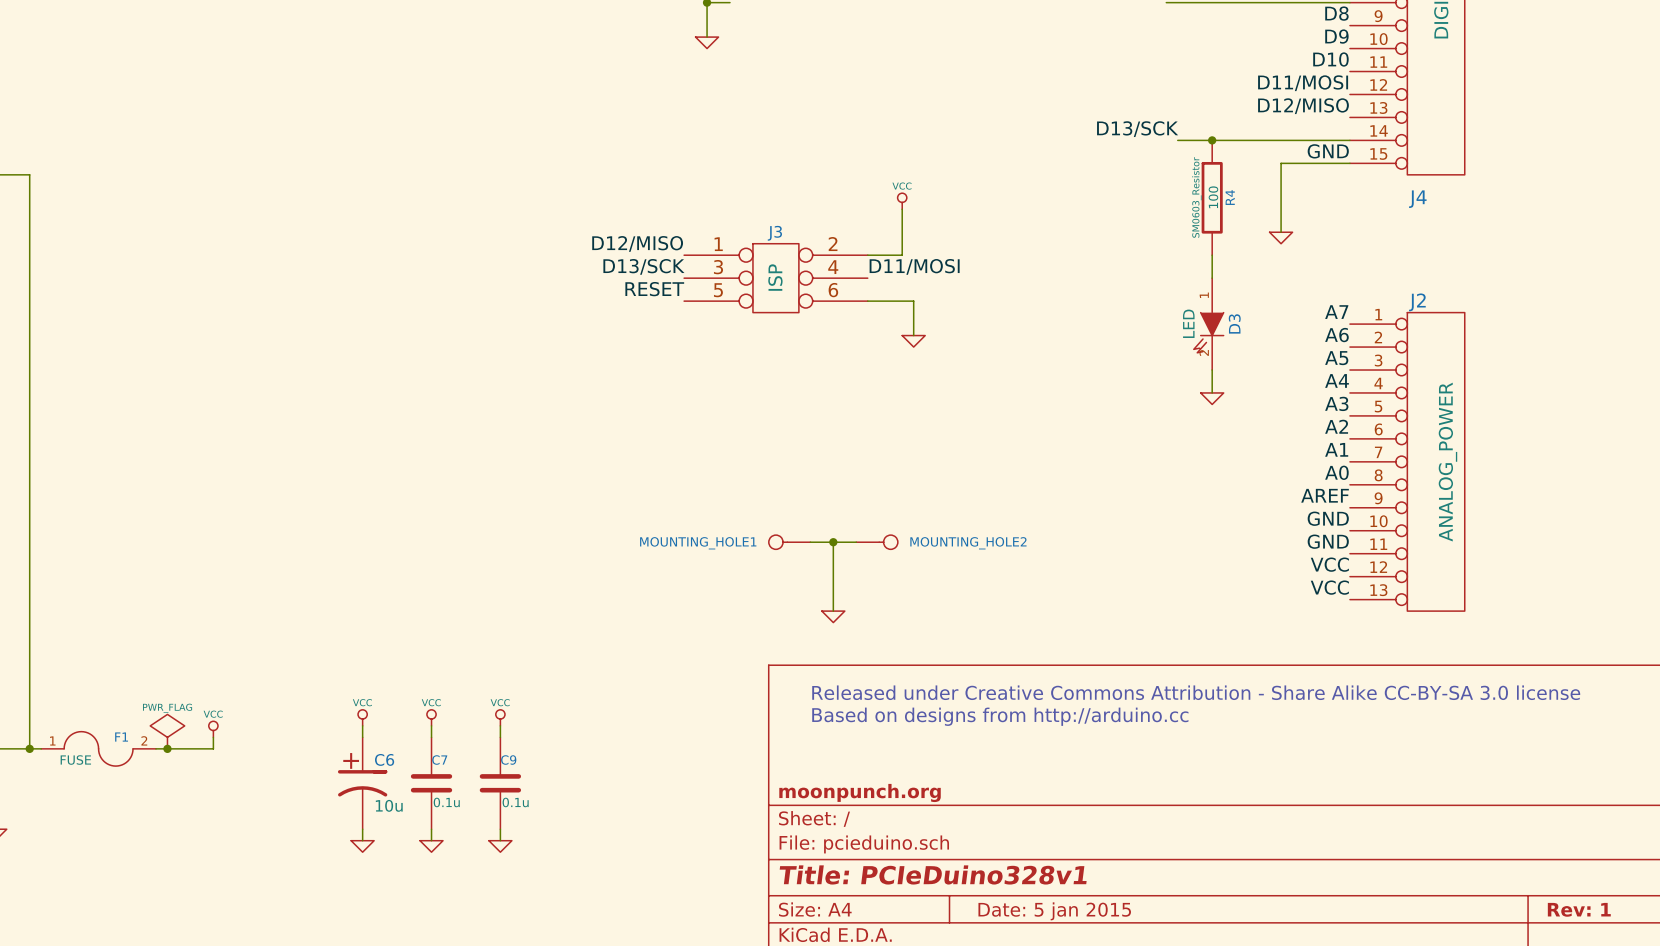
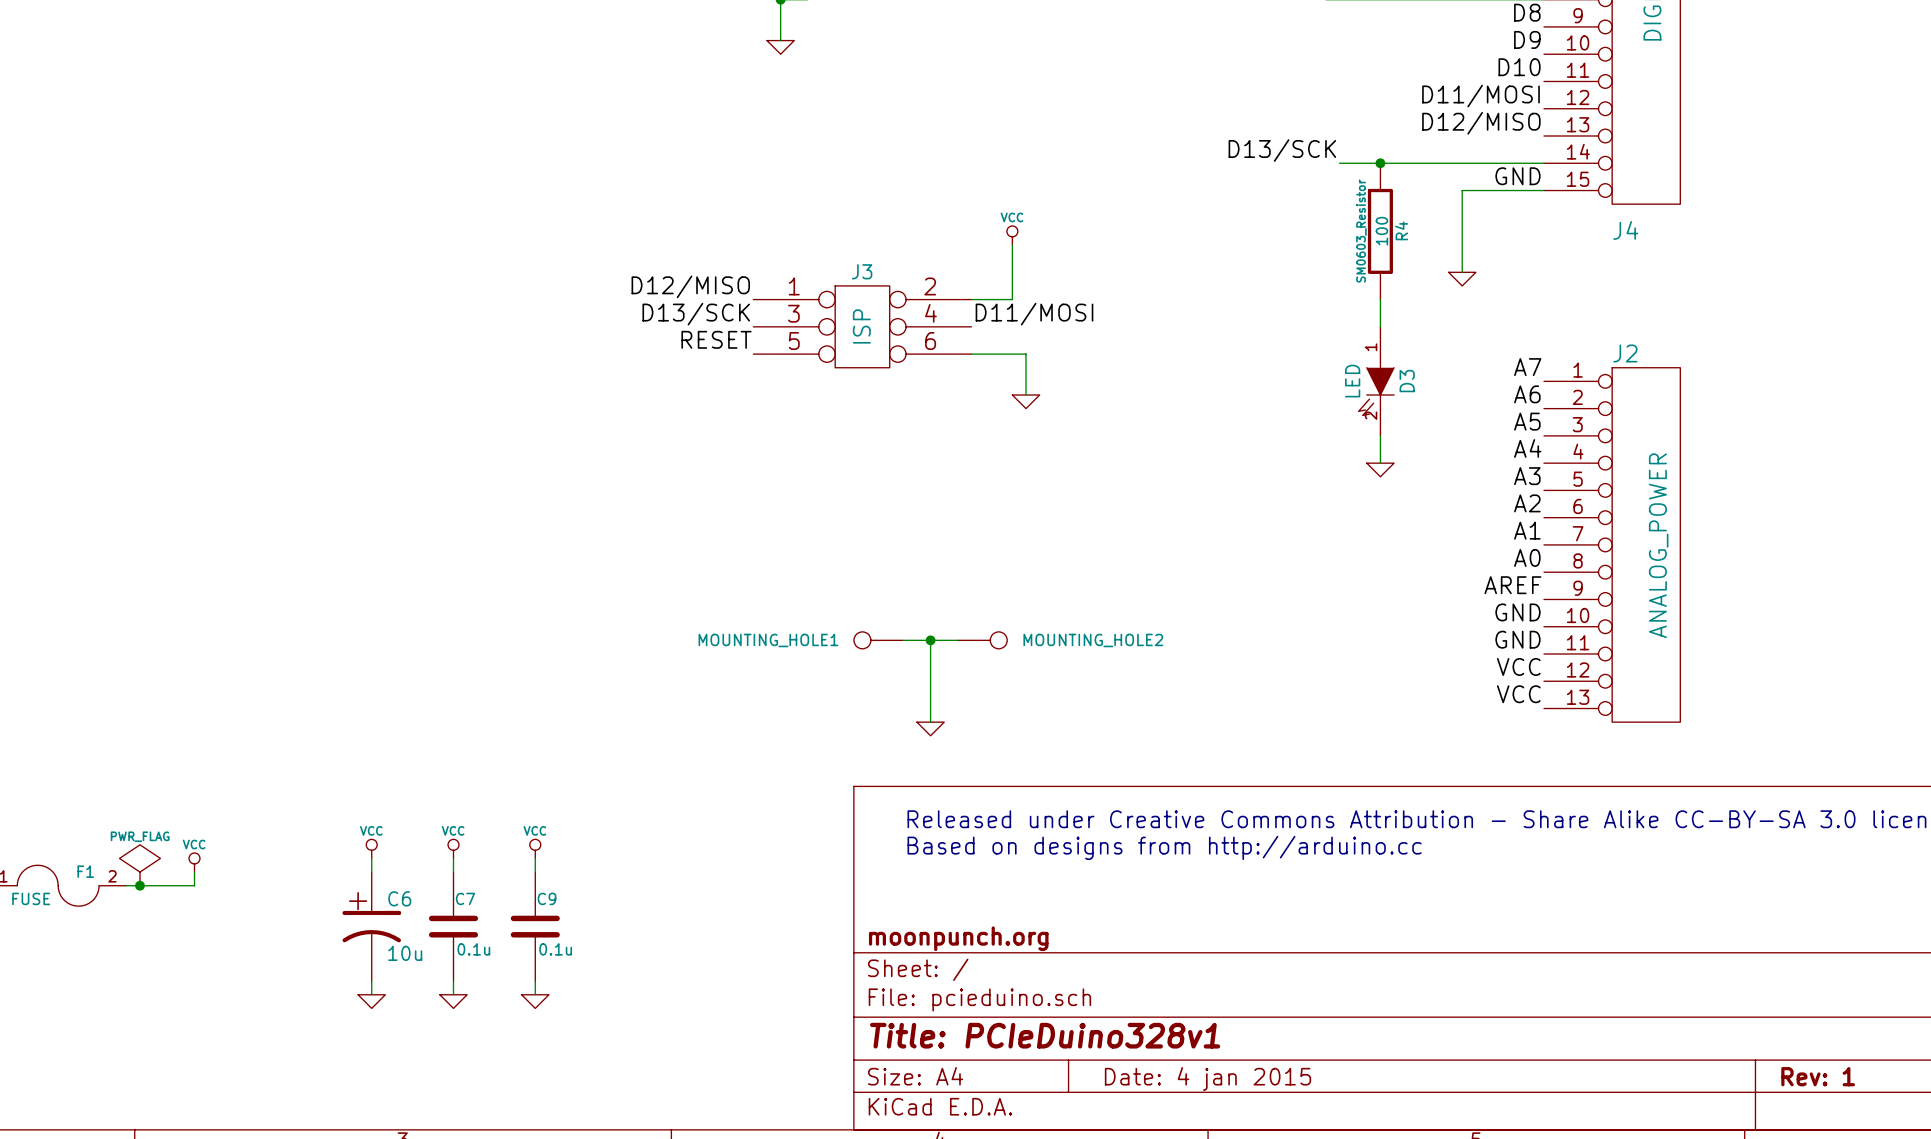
title block: Date: 5 jan 2015 (1054, 911) -> Date: 4 jan 2015 (1208, 1078)

